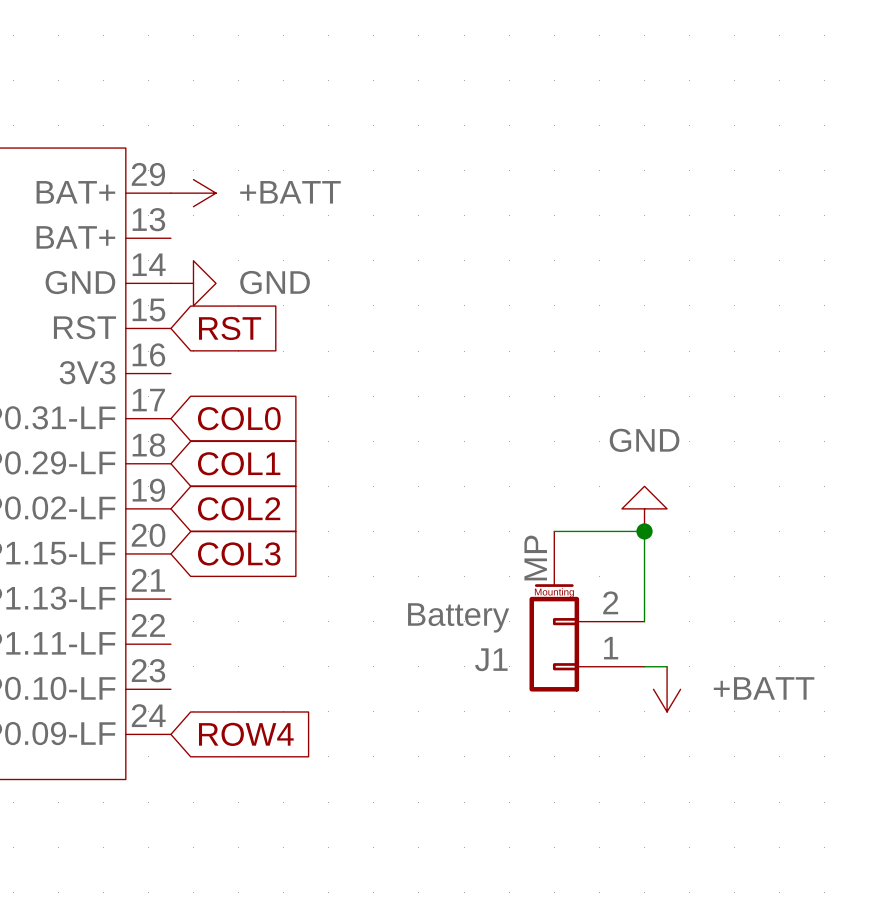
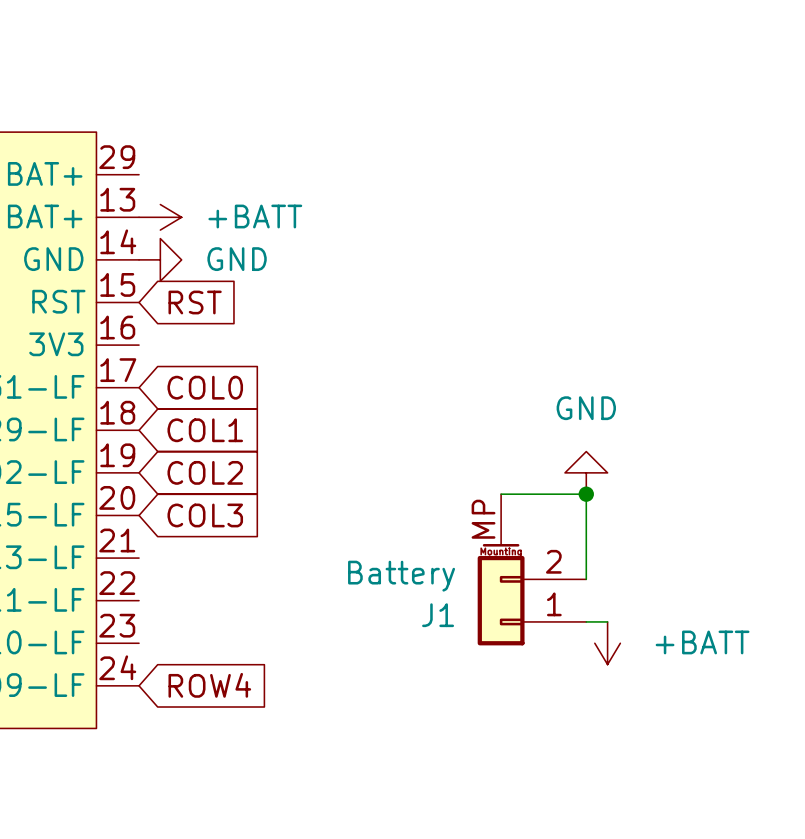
power symbol position: +BATT (193, 193) -> +BATT (160, 217)

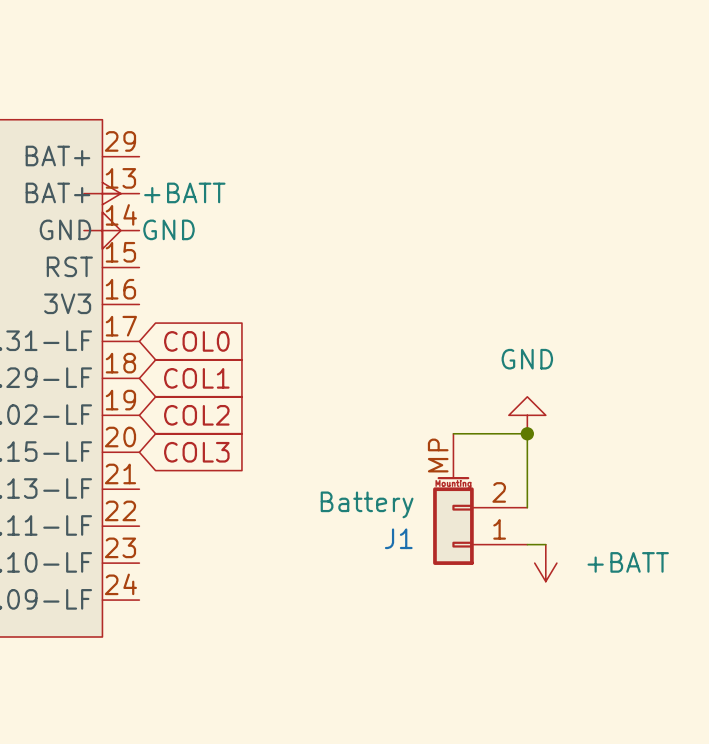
power symbol position: +BATT (160, 217) -> +BATT (102, 193)
power symbol position: GND (160, 259) -> GND (102, 230)
global label: RST (195, 302) -> none
global label: ROW4 (209, 685) -> none

